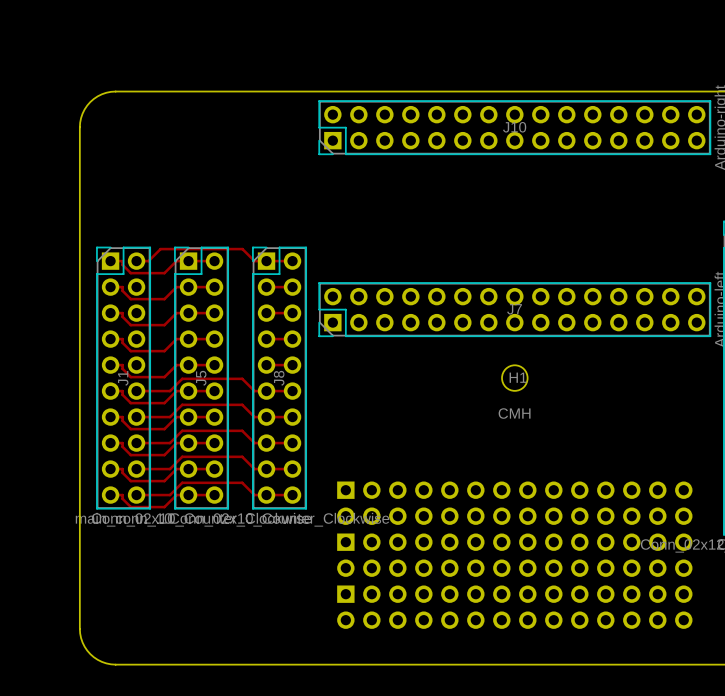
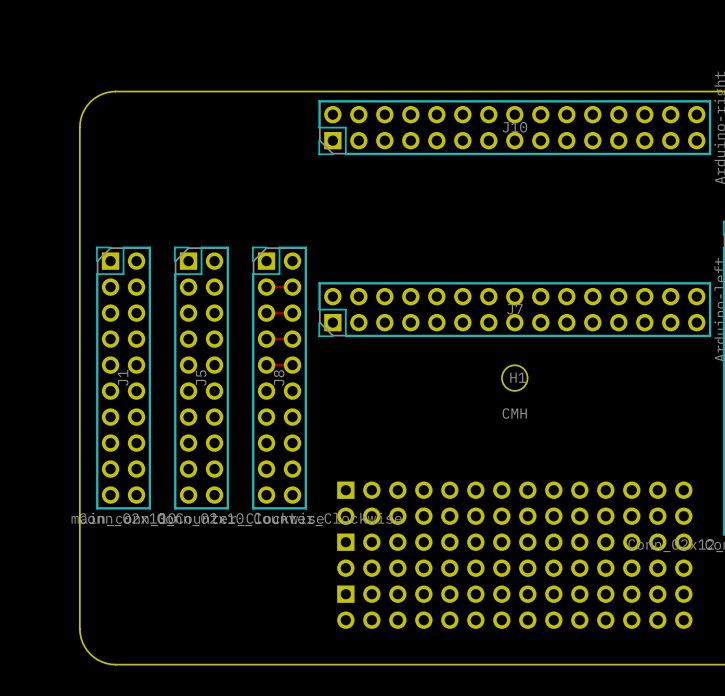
track: (110, 261) (122, 261) (122, 264) (130, 273) (164, 273) (176, 261) (214, 261) -> none
track: (136, 261) (148, 261) (160, 249) (242, 249) (254, 261) (292, 261) -> none
track: (110, 287) (122, 287) (122, 290) (130, 299) (164, 299) (176, 287) (214, 287) -> none
track: (110, 313) (122, 313) (122, 316) (130, 325) (164, 325) (176, 313) (214, 313) -> none
track: (110, 339) (122, 339) (122, 342) (130, 351) (164, 351) (176, 339) (214, 339) -> none
track: (110, 365) (122, 365) (122, 368) (130, 377) (164, 377) (176, 365) (214, 365) -> none
track: (110, 391) (122, 391) (122, 394) (130, 403) (164, 403) (176, 391) (214, 391) -> none
track: (136, 391) (170, 391) (182, 378) (242, 378) (254, 391) (292, 391) -> none
track: (110, 417) (122, 417) (122, 420) (130, 429) (164, 429) (176, 417) (214, 417) -> none
track: (136, 417) (170, 417) (182, 404) (242, 404) (254, 417) (292, 417) -> none
track: (110, 443) (122, 443) (122, 446) (130, 455) (164, 455) (176, 443) (214, 443) -> none
track: (136, 443) (170, 443) (182, 430) (242, 430) (254, 443) (292, 443) -> none
track: (110, 469) (122, 469) (122, 472) (130, 481) (164, 481) (176, 469) (214, 469) -> none
track: (136, 469) (170, 469) (182, 456) (242, 456) (254, 469) (292, 469) -> none
track: (110, 495) (122, 495) (122, 498) (130, 507) (164, 507) (176, 495) (214, 495) -> none
track: (136, 495) (170, 495) (182, 482) (242, 482) (254, 495) (292, 495) -> none

